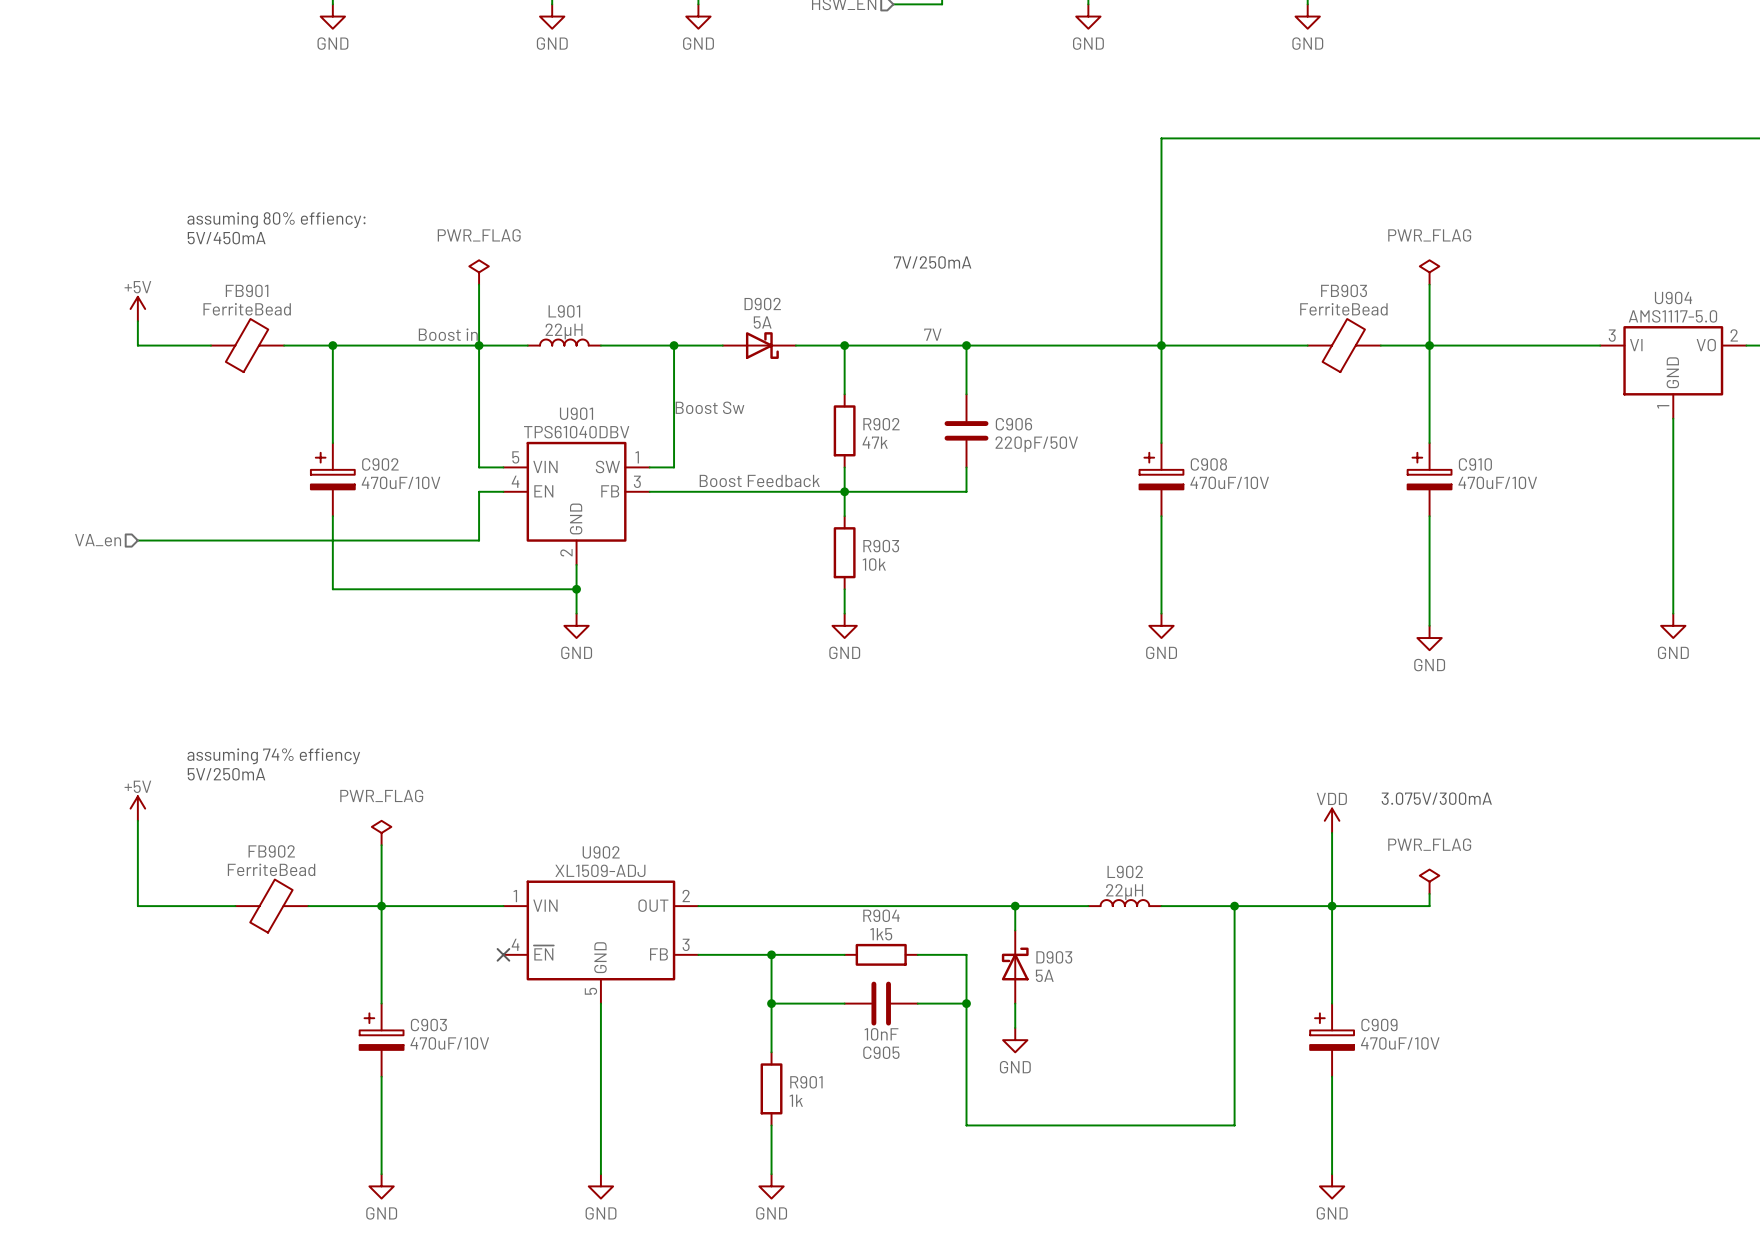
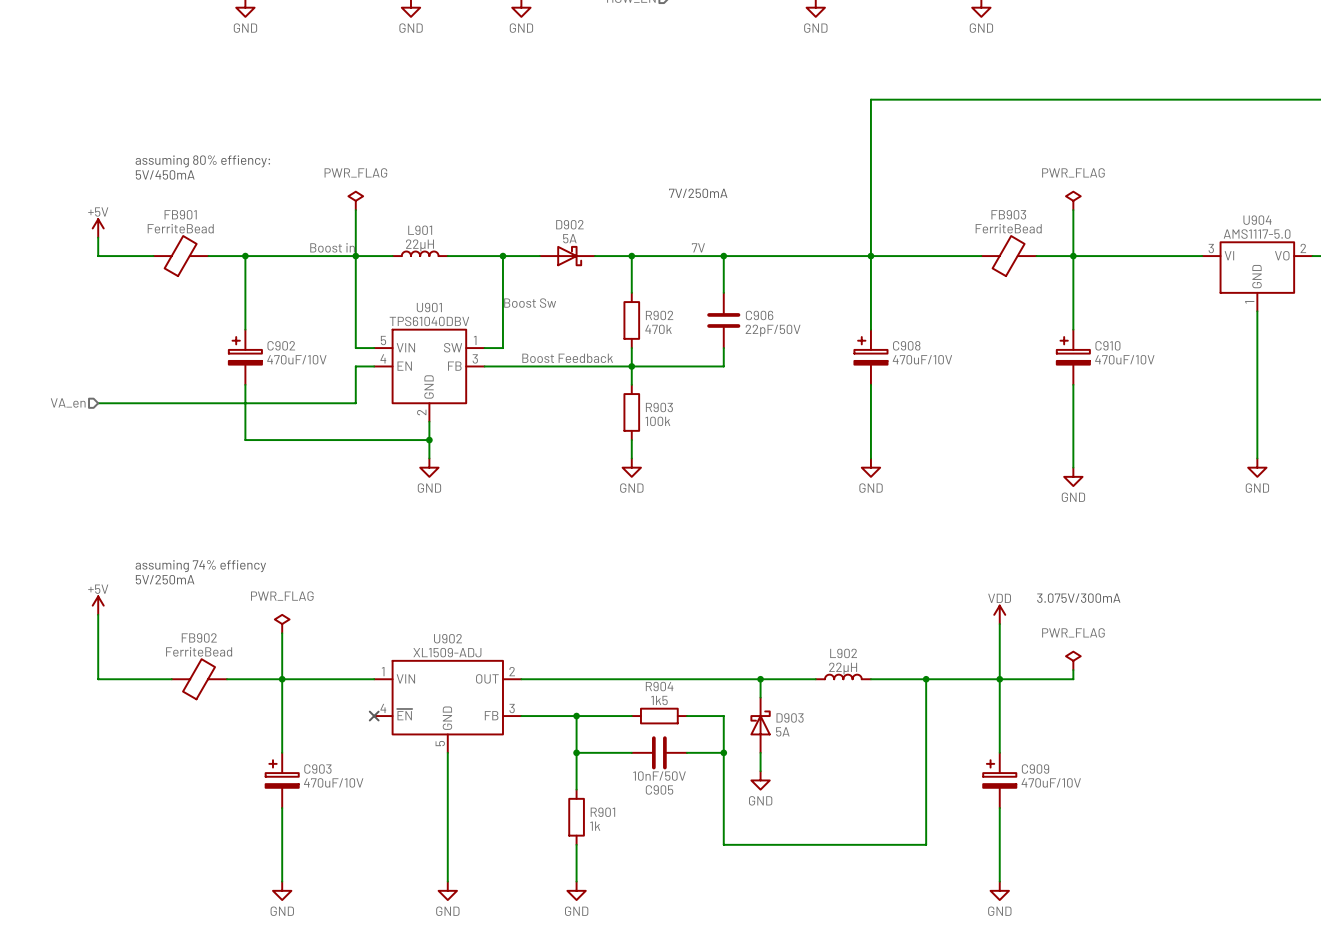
R902 value: 47k (875, 442) -> 470k (658, 329)
C906 value: 220pF/50V (1036, 444) -> 22pF/50V (773, 330)
R903 value: 10k (874, 564) -> 100k (657, 421)
C905 value: 10nF (881, 1034) -> 10nF/50V (659, 776)

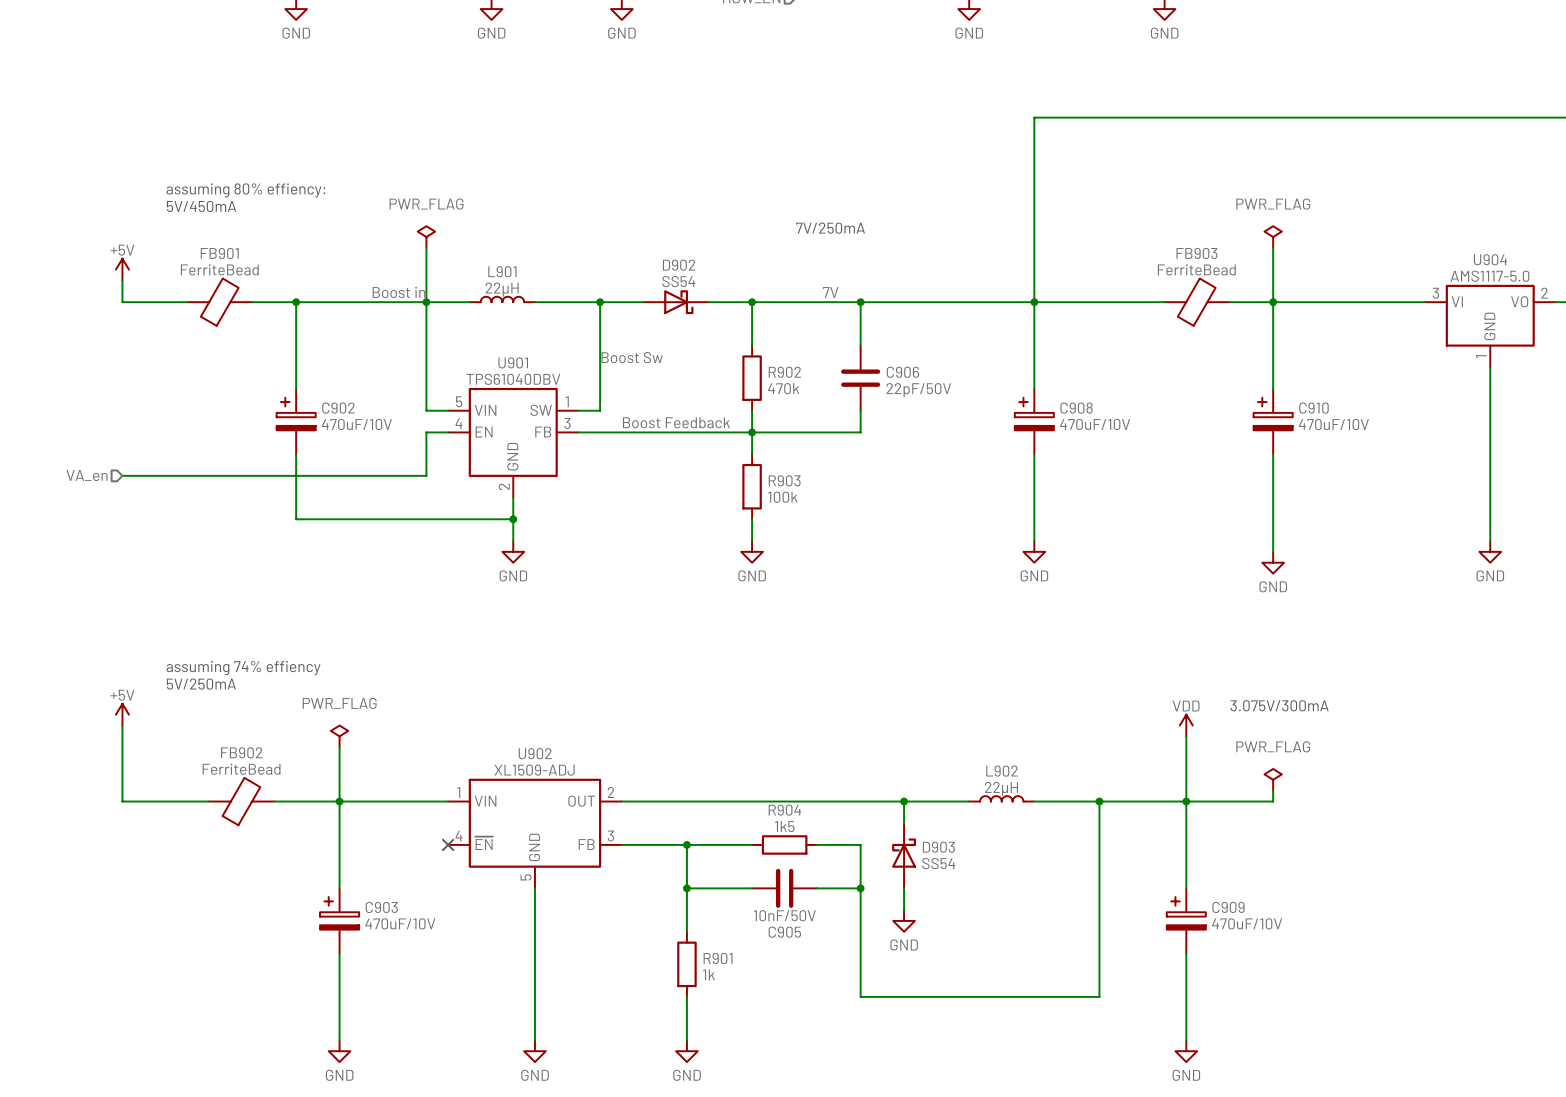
D902 value: 5A (569, 238) -> SS54 (678, 281)
D903 value: 5A (782, 731) -> SS54 (938, 863)

